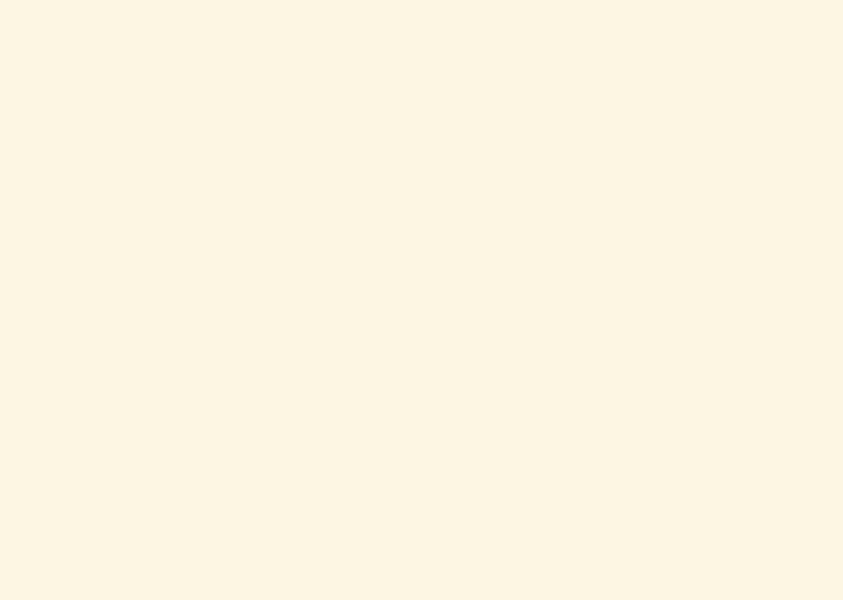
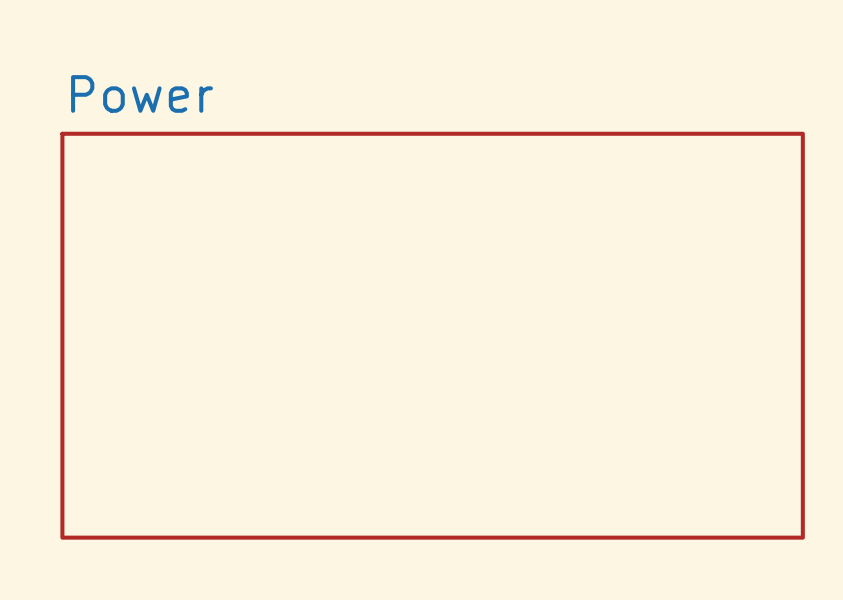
sheet Power: none -> (432, 335)

